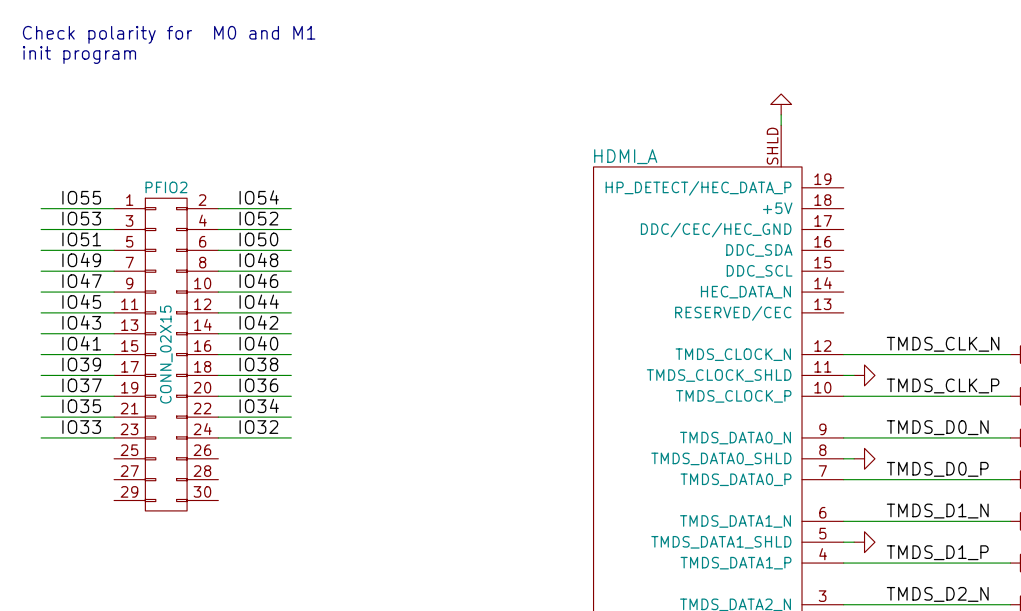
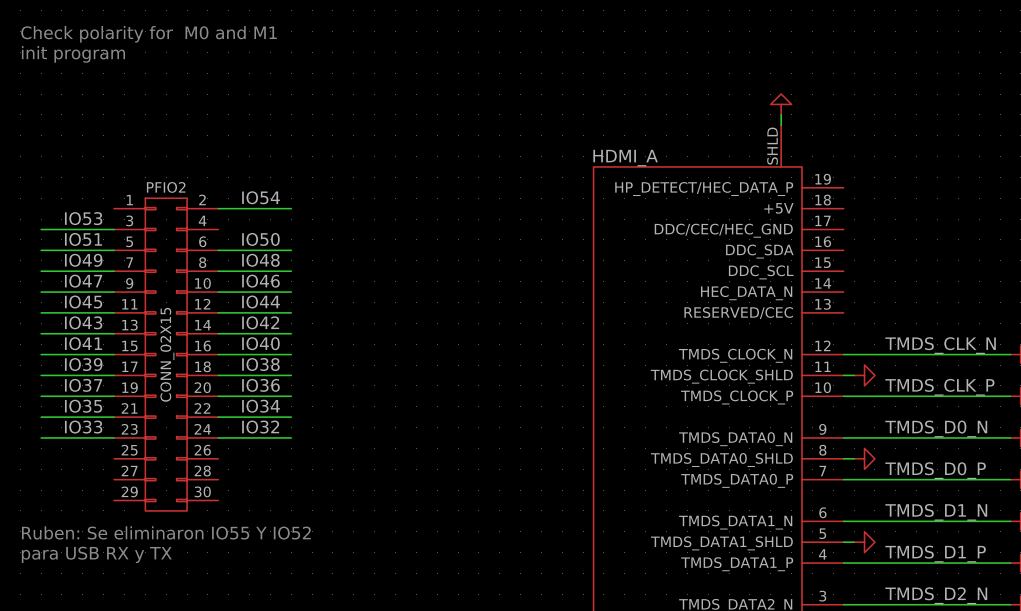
label: IO55 (81, 197) -> none
wire: (41, 208) (114, 208) -> none
label: IO52 (258, 218) -> none
wire: (218, 229) (291, 229) -> none
text: none -> Ruben: Se eliminaron IO55 Y IO52 (166, 532)
text: none -> para USB RX y TX (96, 554)

